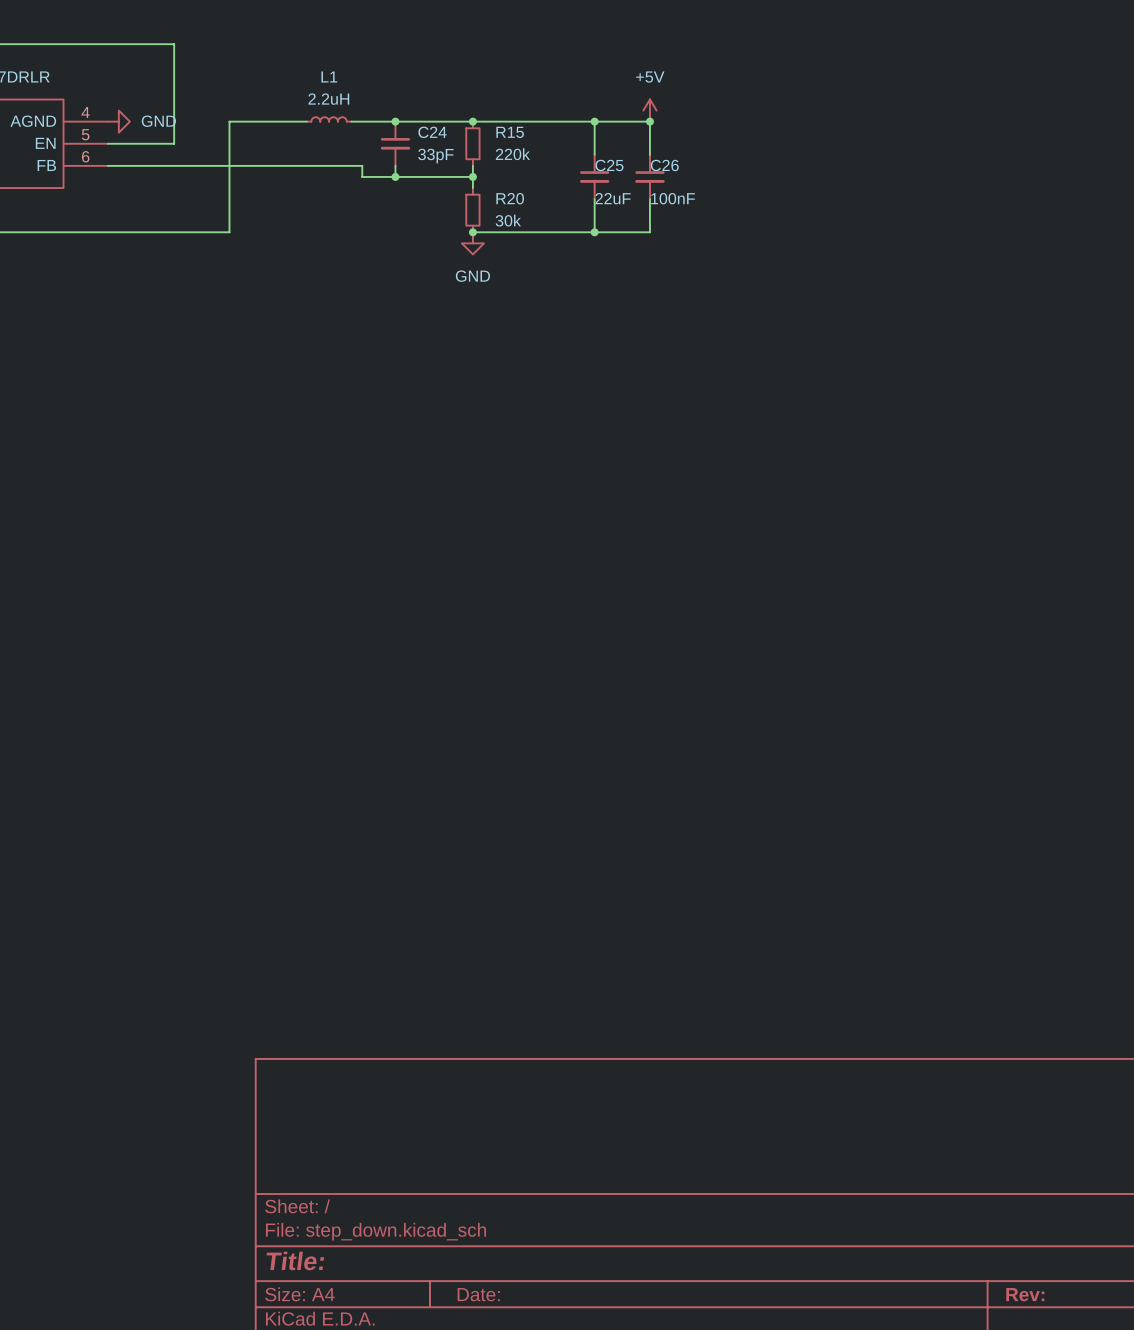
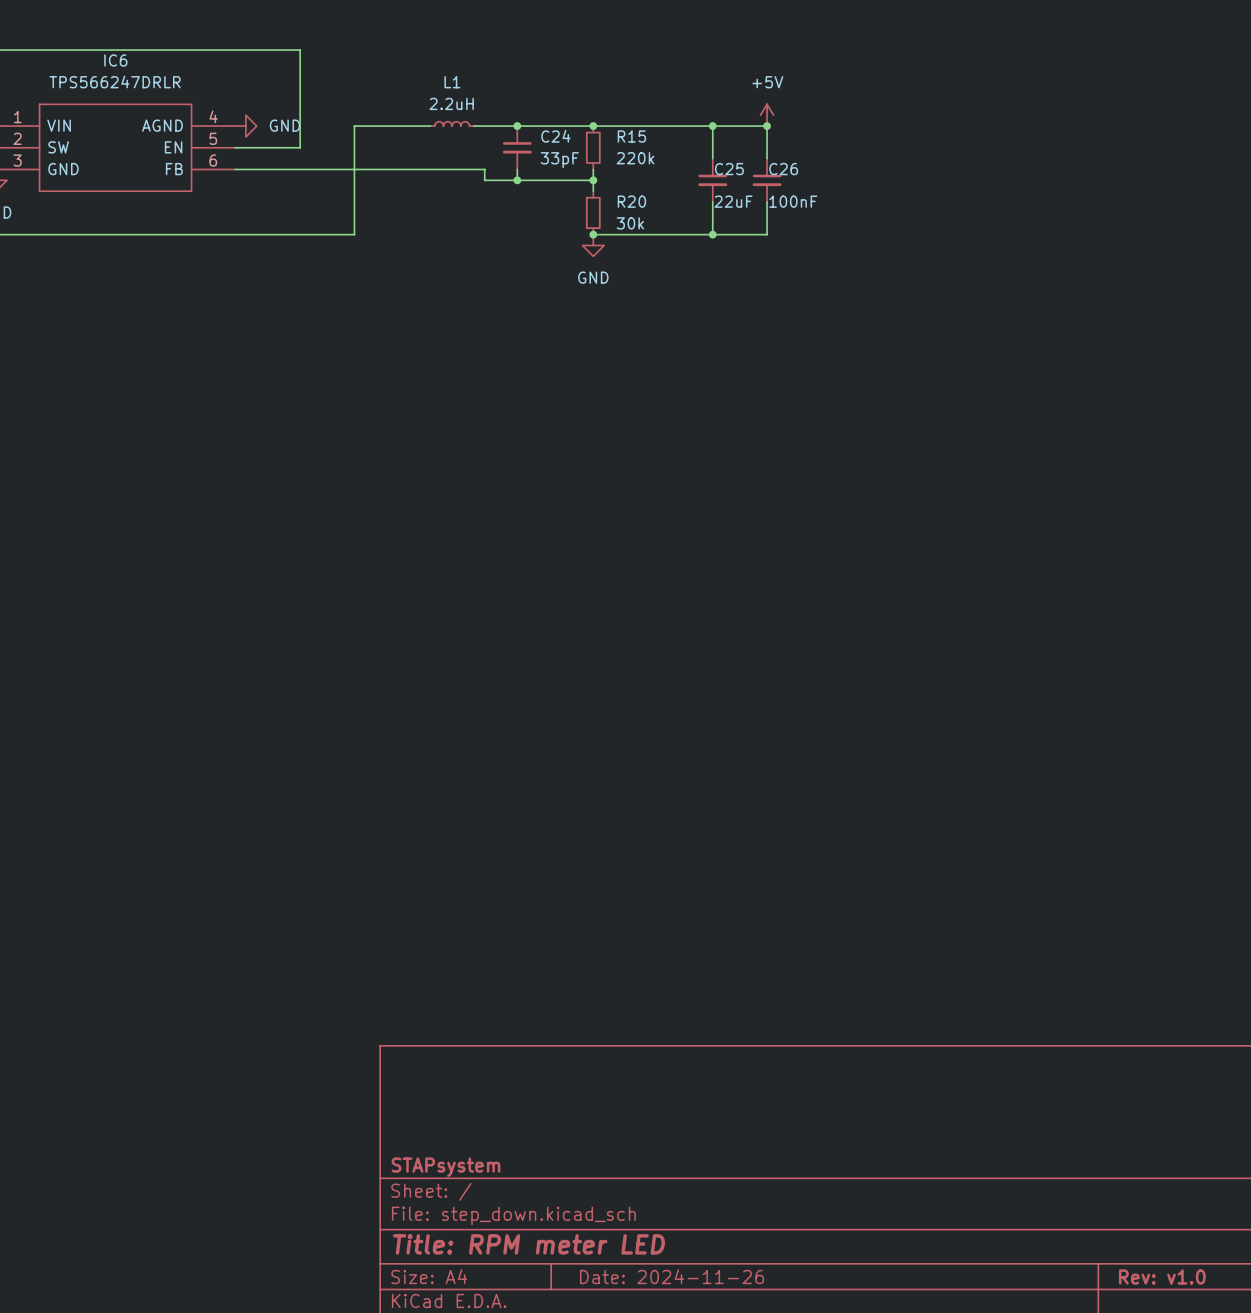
title block: none -> STAPsystem (445, 1167)
title block: Title: (295, 1260) -> Title: RPM meter LED (529, 1244)
title block: Date: (478, 1294) -> Date: 2024-11-26 (672, 1276)
title block: Rev: (1025, 1294) -> Rev: v1.0 (1162, 1277)

